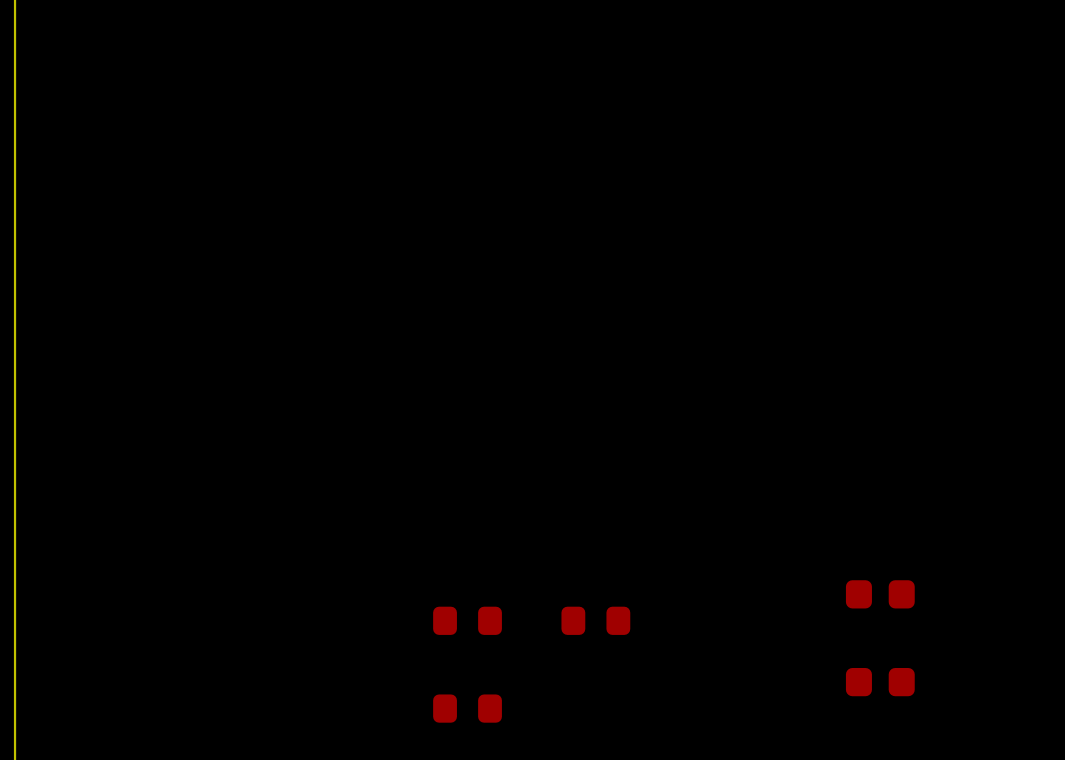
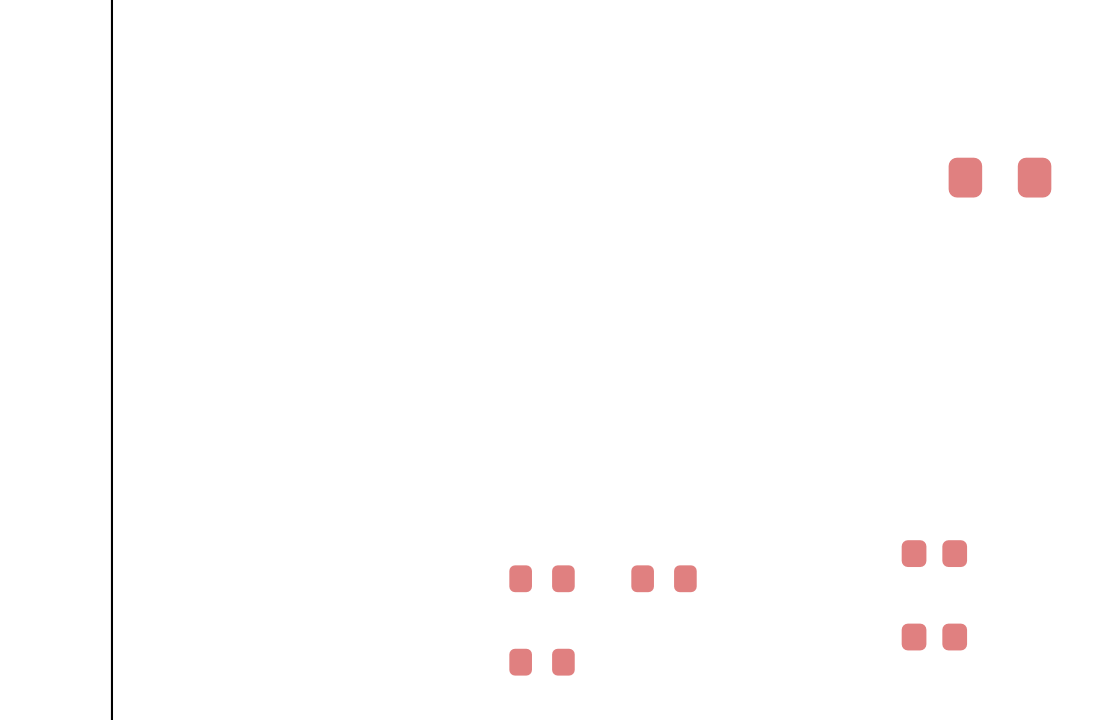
part: none -> (999, 177)

